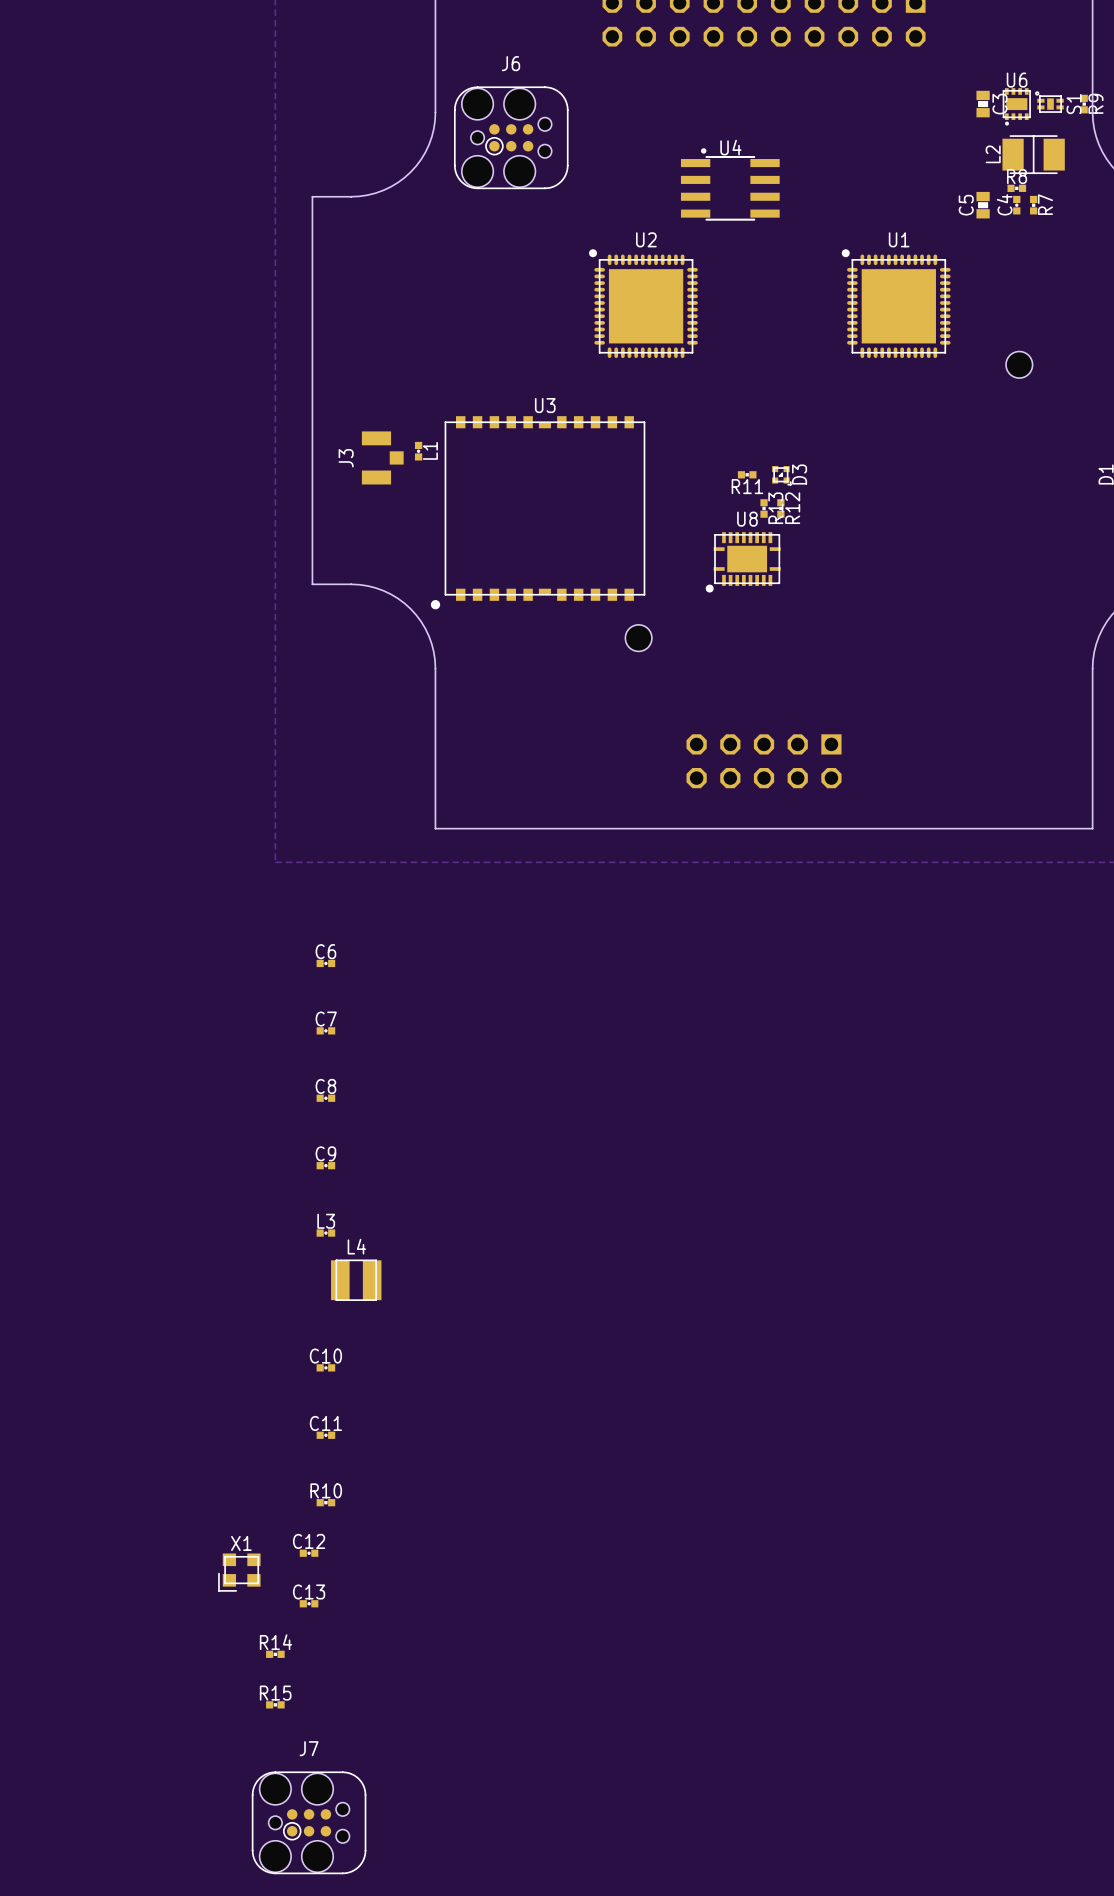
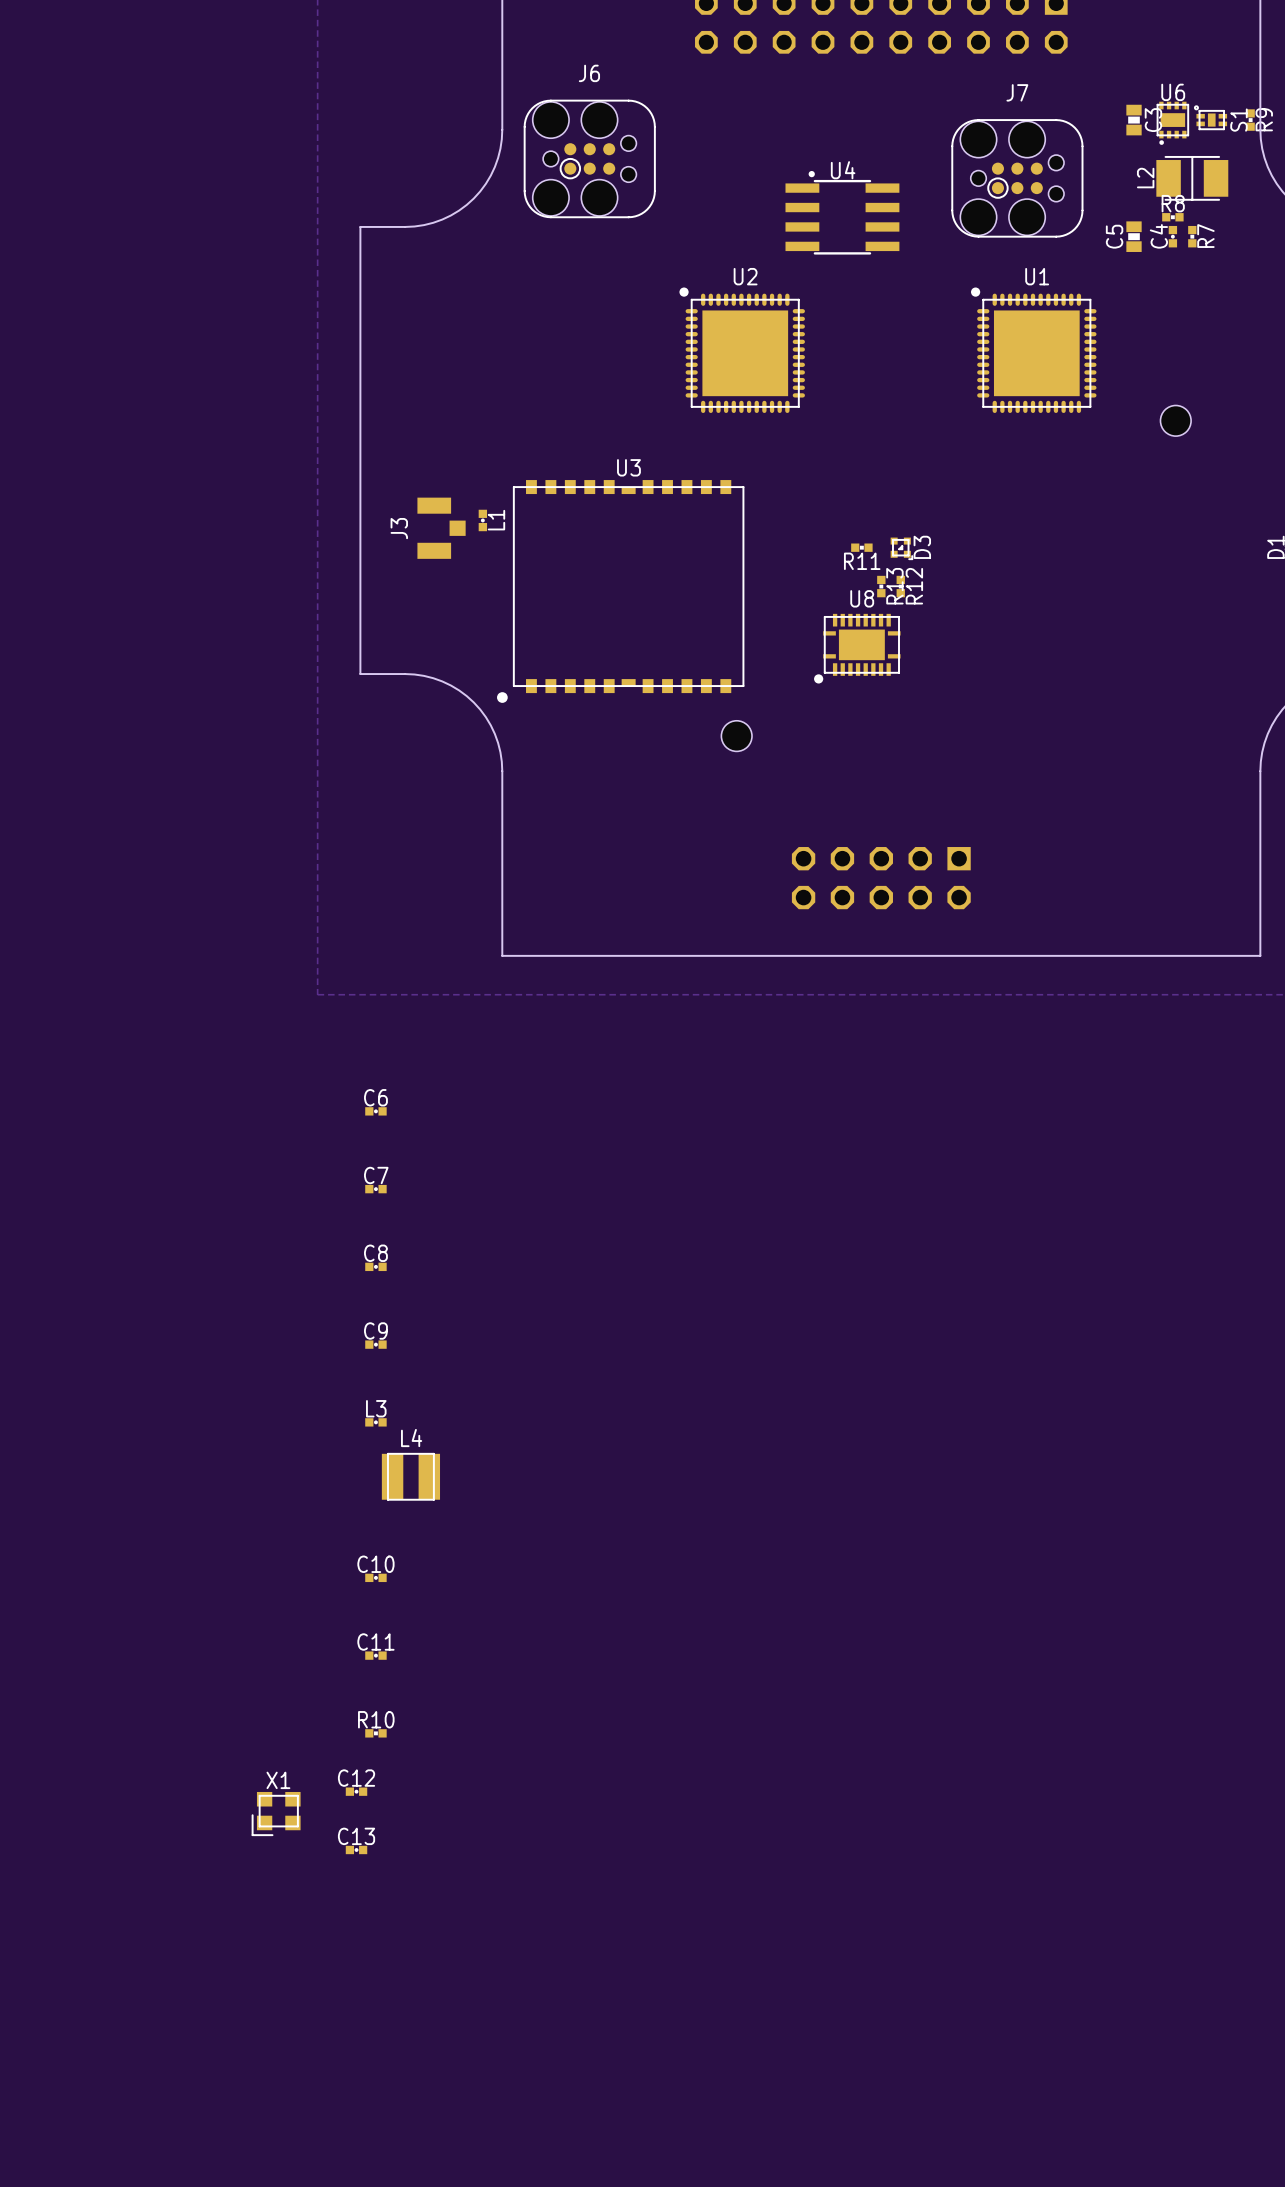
R14: (275, 1654) -> none
R15: (275, 1704) -> none
J7 position: (309, 1822) -> (1017, 178)

